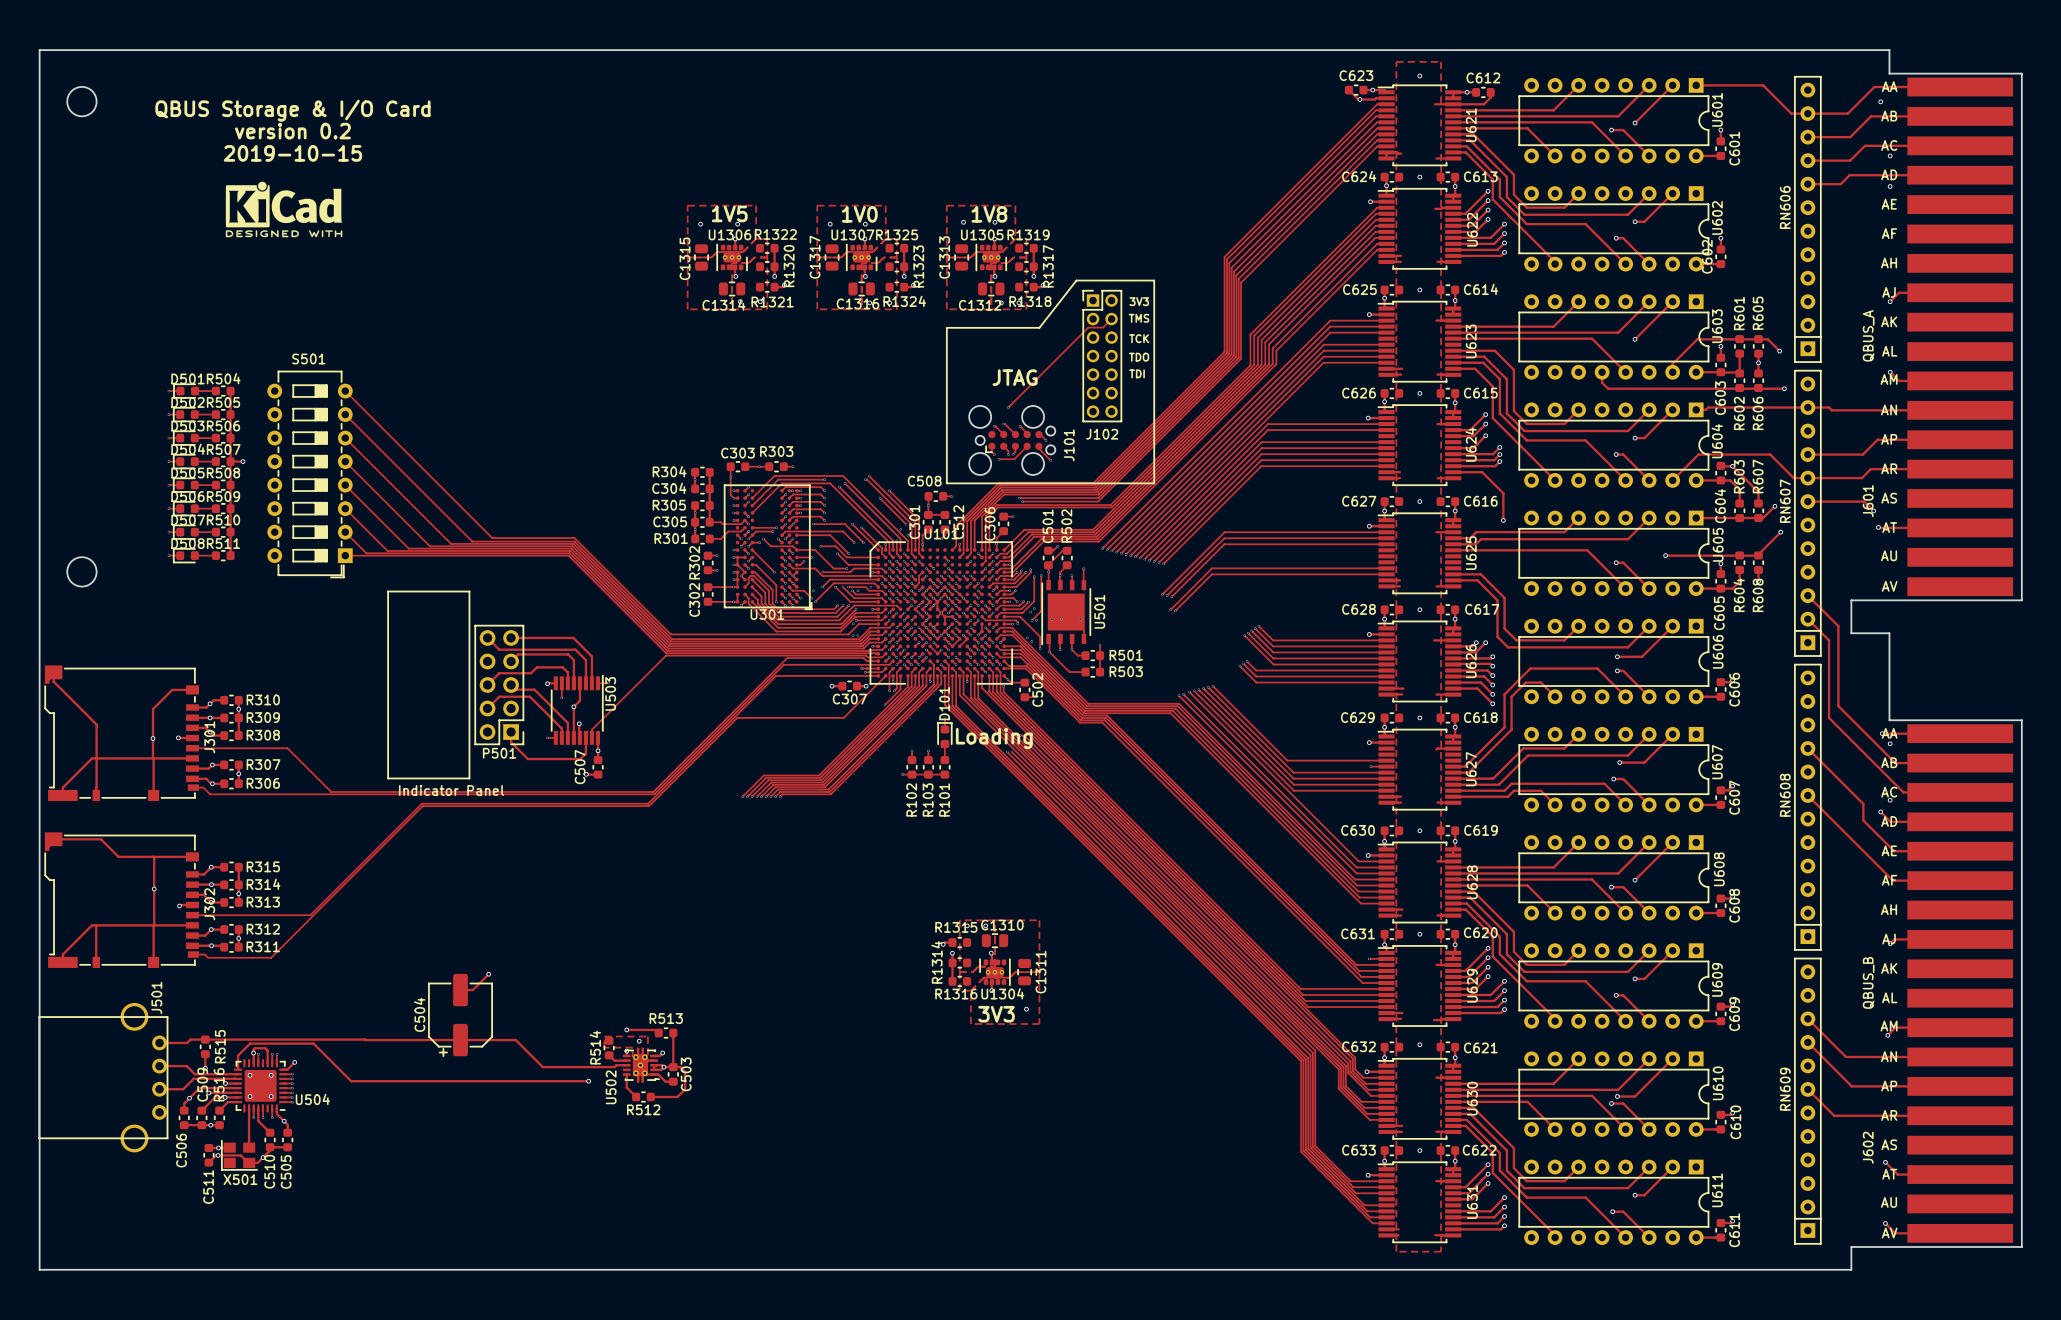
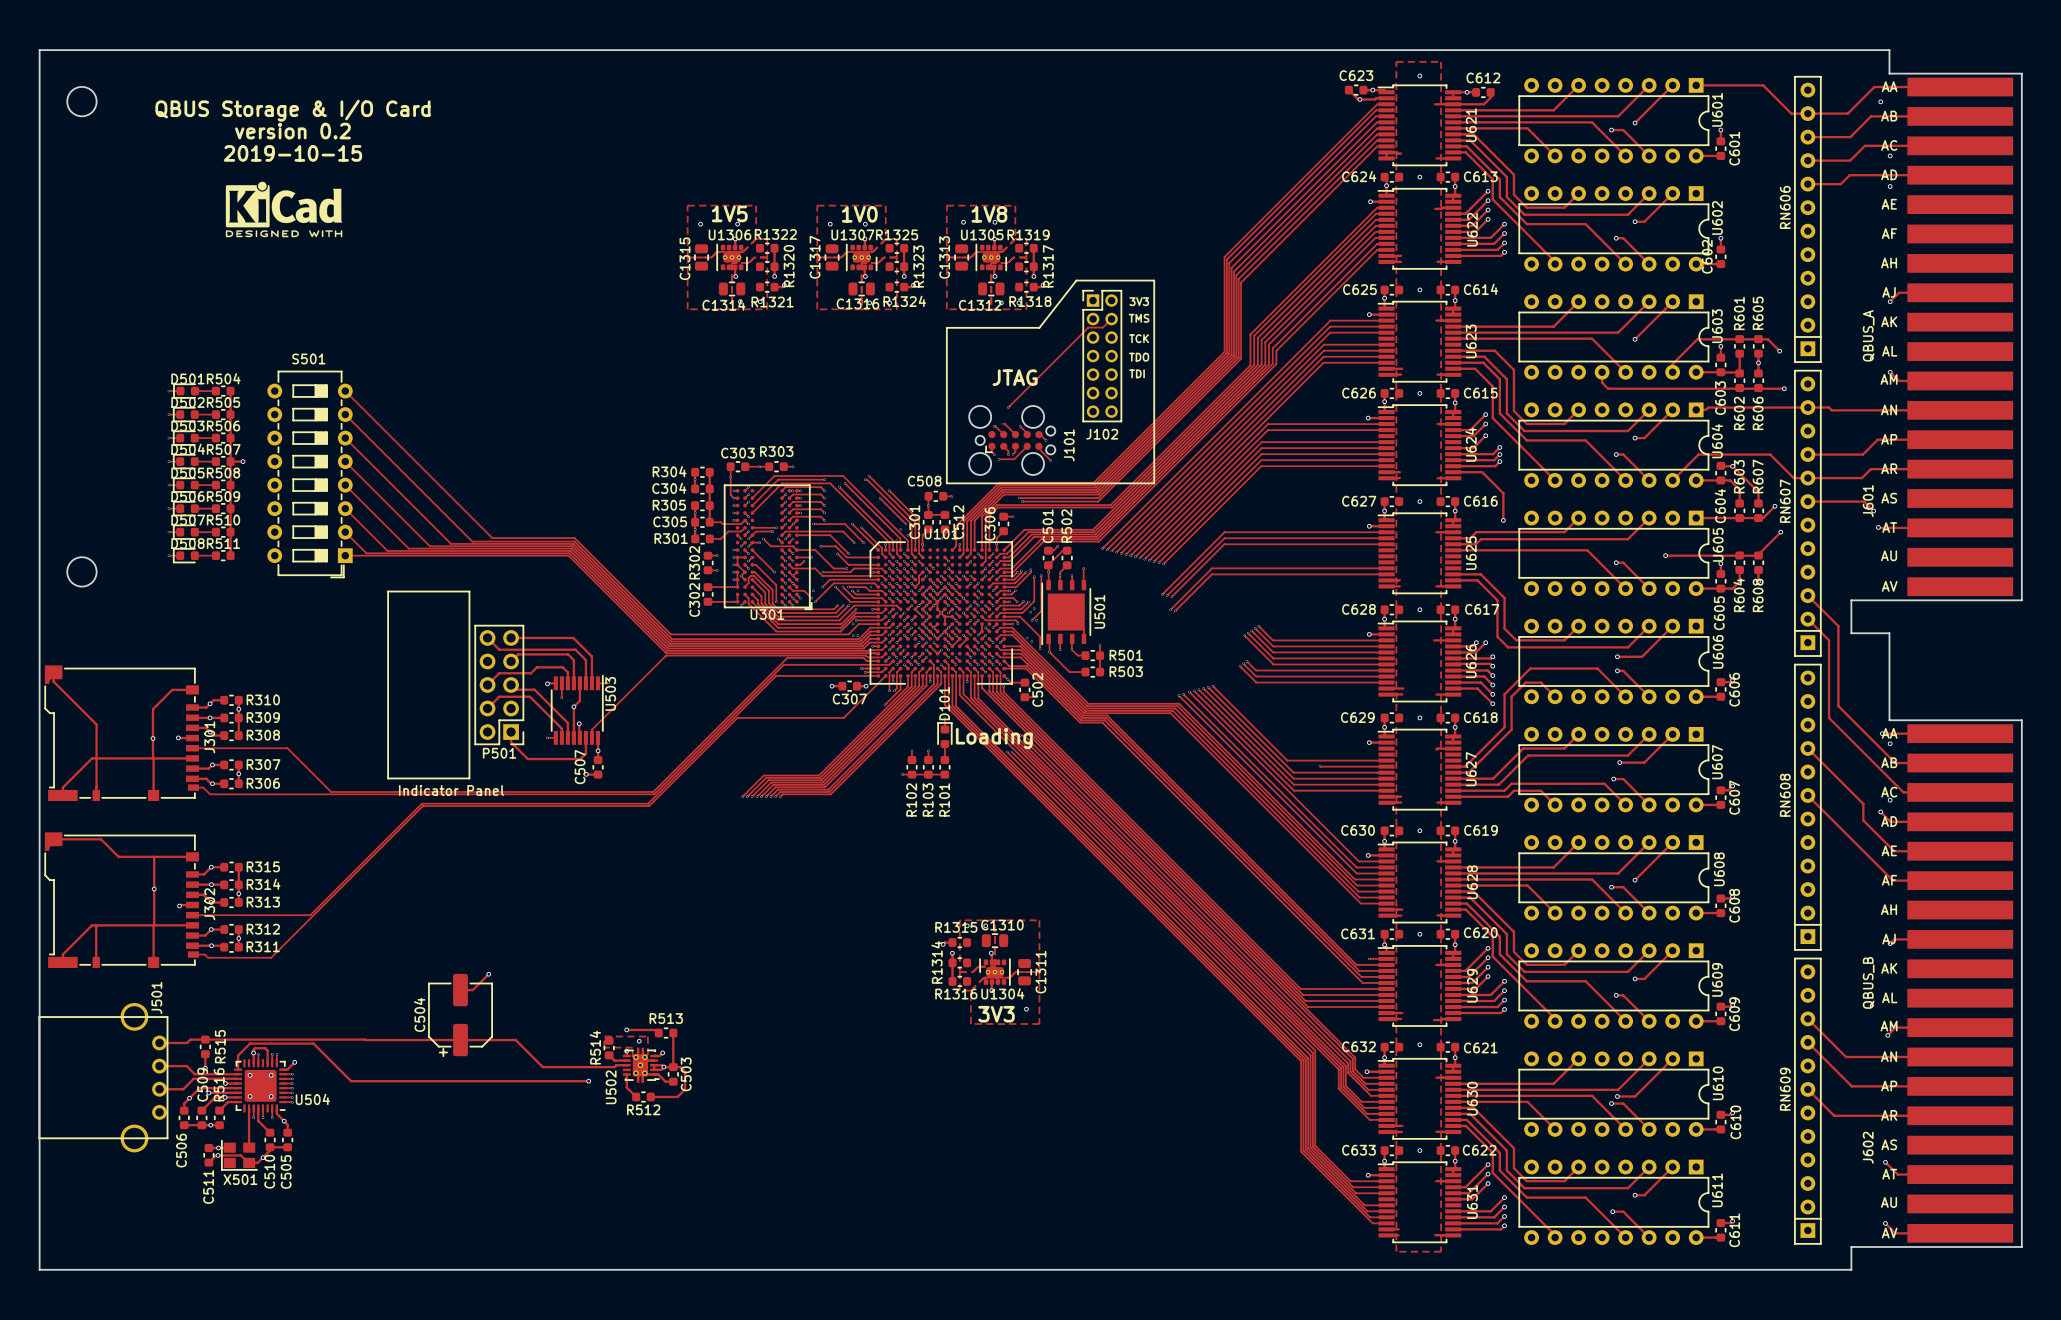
track: none -> (1319, 766) (1370, 766)
via position: (1370, 766) -> (1319, 766)

